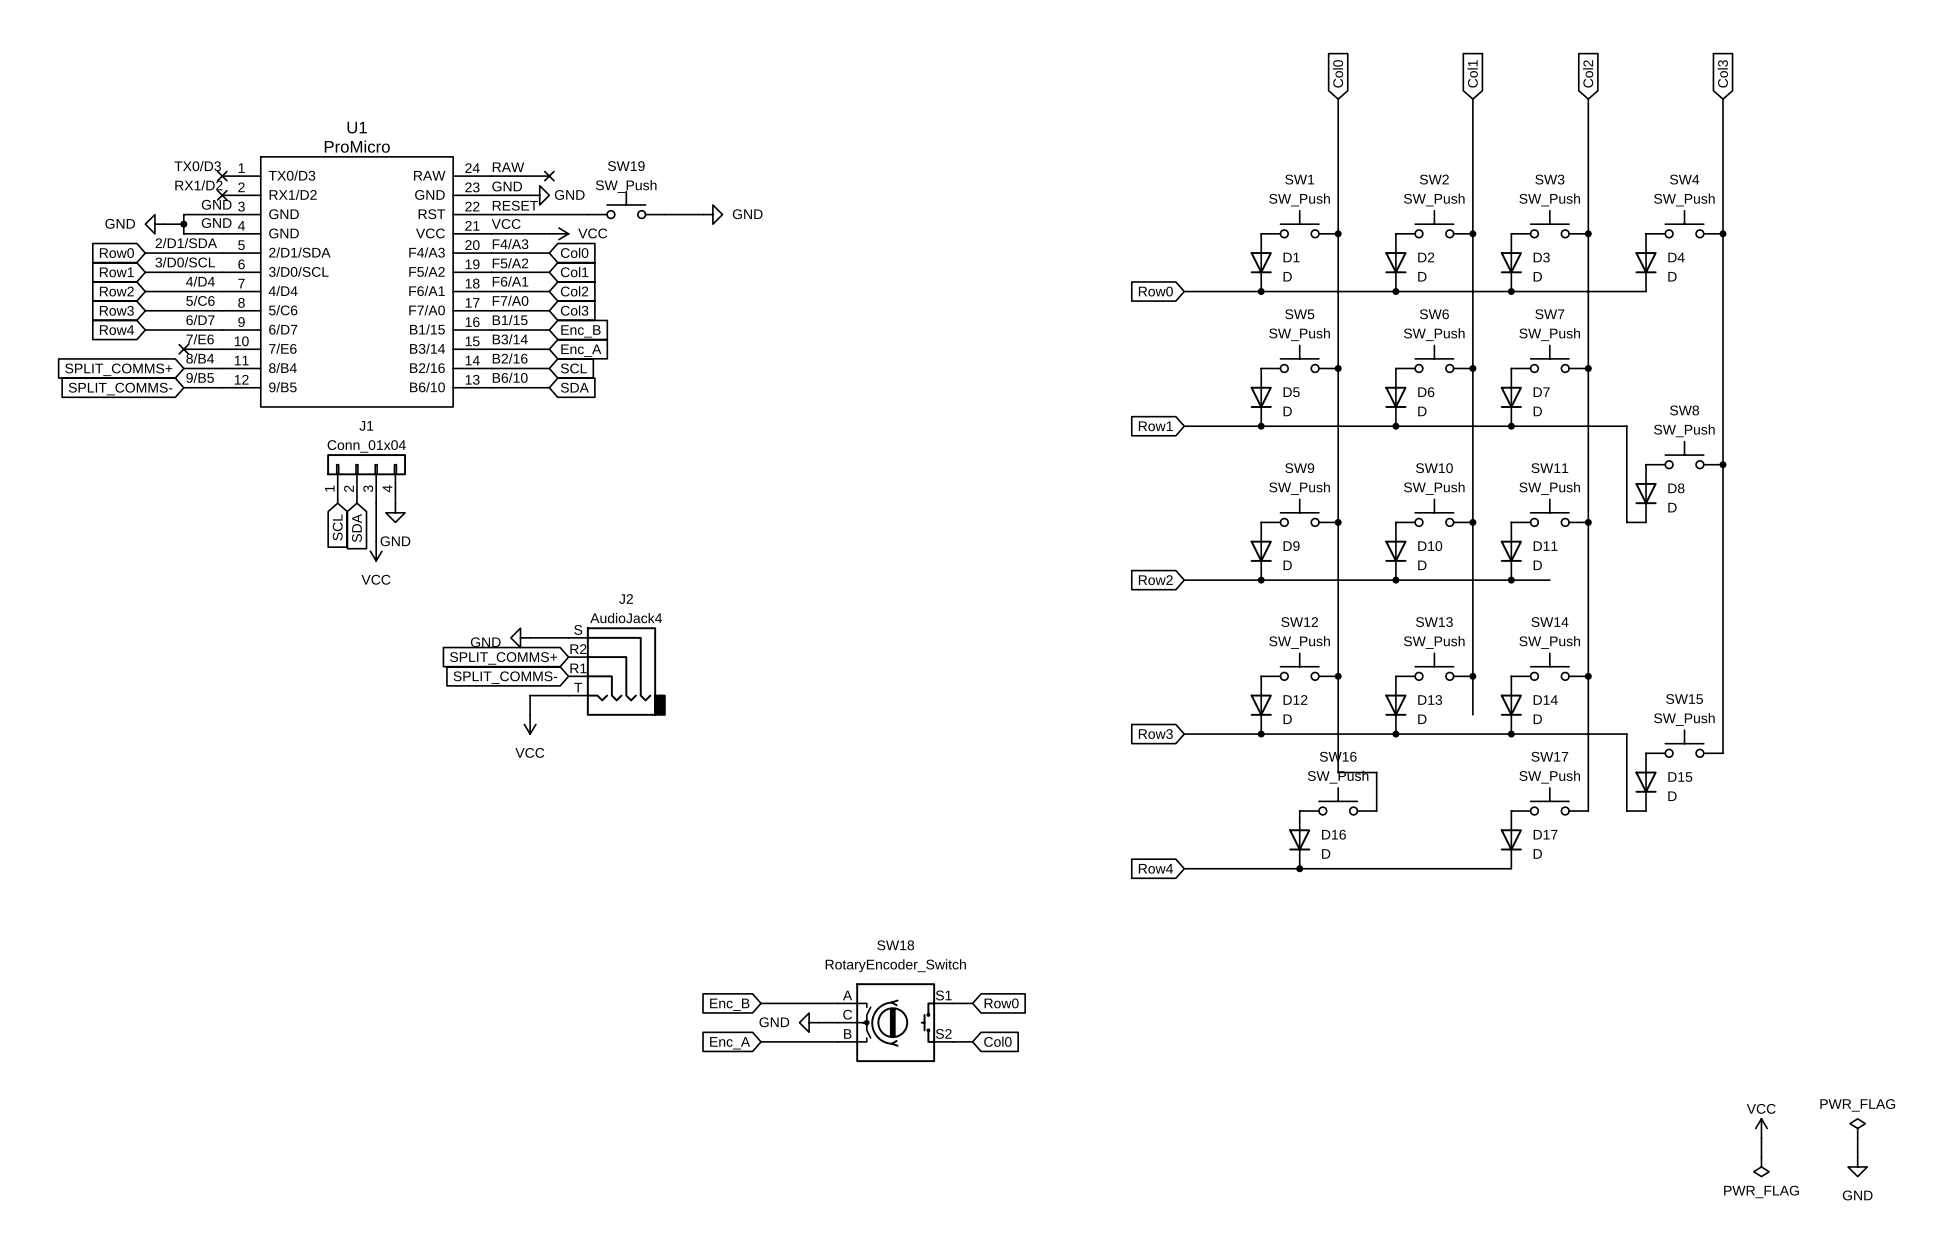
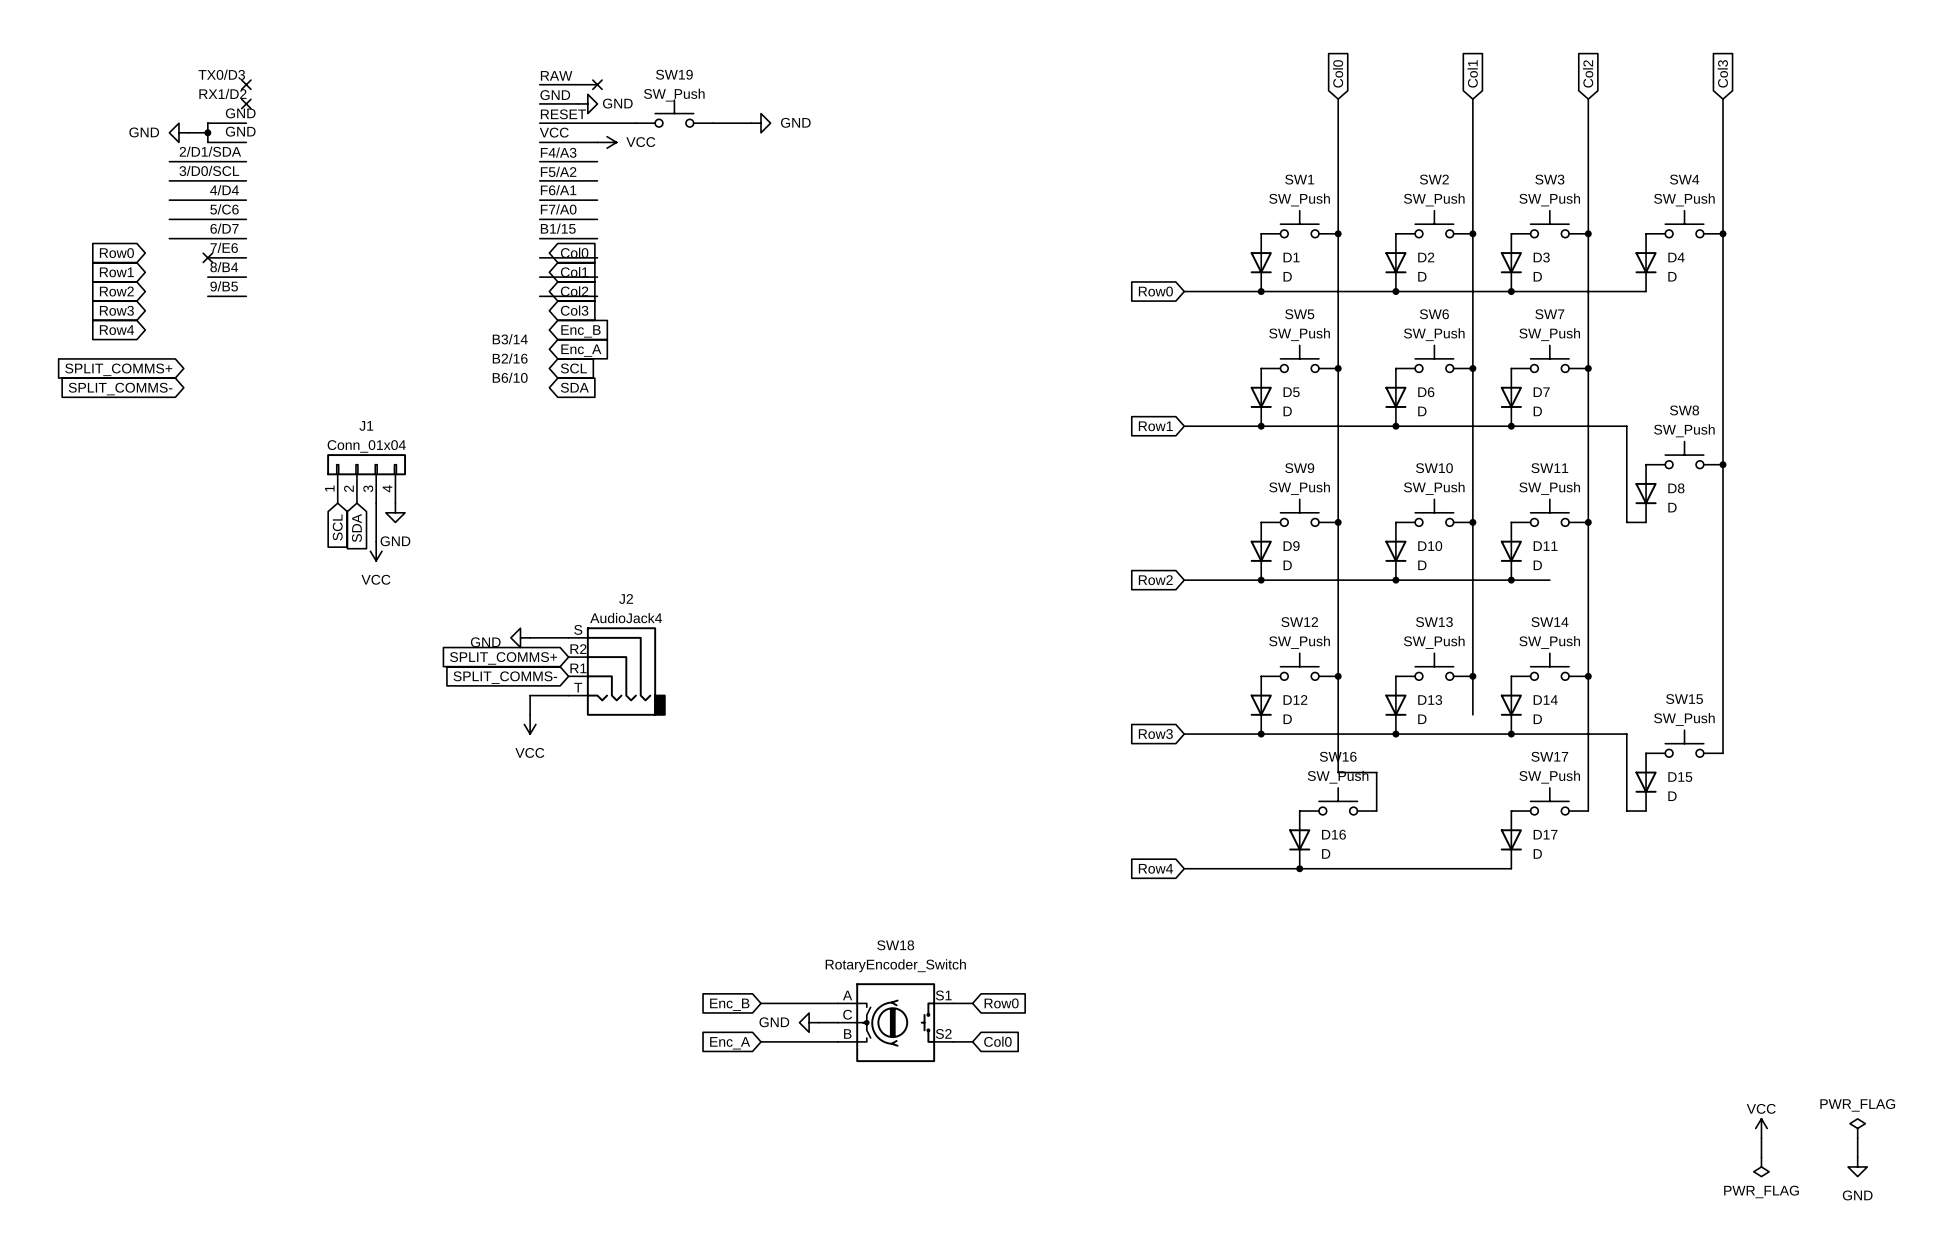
no-connect mark: none -> (246, 84)
no-connect mark: none -> (597, 84)
no-connect mark: none -> (246, 103)
power symbol: none -> GND (587, 103)
text: none -> GND (240, 113)
power symbol: none -> GND (760, 123)
text: none -> GND (240, 131)
junction: none -> (207, 132)
text position: TX0/D3 (197, 166) -> TX0/D3 (221, 74)
text position: RAW (508, 167) -> RAW (556, 75)
no-connect mark: (222, 176) -> none
wire: (491, 176) (549, 176) -> (539, 84) (597, 84)
no-connect mark: (549, 176) -> none
text position: RX1/D2 (198, 185) -> RX1/D2 (222, 93)
text position: GND (507, 186) -> GND (555, 95)
no-connect mark: (222, 195) -> none
wire: (491, 195) (530, 195) -> (539, 103) (578, 103)
power symbol: GND (539, 195) -> none
text: GND (216, 204) -> none
SW19 position: (626, 204) -> (674, 113)
text position: RESET (515, 205) -> RESET (563, 114)
wire: (222, 214) (183, 214) (183, 233) (222, 233) -> (246, 123) (207, 123) (207, 142) (246, 142)
wire: (491, 214) (587, 214) -> (539, 123) (635, 123)
wire: (664, 214) (703, 214) -> (712, 123) (751, 123)
power symbol: GND (712, 214) -> none
text: GND (216, 223) -> none
power symbol position: GND (154, 224) -> GND (178, 132)
wire: (164, 224) (183, 224) -> (188, 132) (207, 132)
junction: (183, 224) -> none
text position: VCC (506, 224) -> VCC (554, 132)
wire: (491, 233) (549, 233) -> (539, 142) (597, 142)
power symbol position: VCC (558, 233) -> VCC (607, 142)
text position: 2/D1/SDA (186, 243) -> 2/D1/SDA (210, 151)
text position: F4/A3 (510, 244) -> F4/A3 (558, 152)
wire: (145, 253) (222, 253) -> (169, 161) (246, 161)
wire: (491, 253) (549, 253) -> (539, 161) (597, 161)
no-connect mark: none -> (207, 257)
text position: 3/D0/SCL (185, 262) -> 3/D0/SCL (209, 170)
text position: F5/A2 (510, 263) -> F5/A2 (558, 171)
wire: (145, 272) (222, 272) -> (169, 180) (246, 180)
wire: (491, 272) (549, 272) -> (539, 180) (597, 180)
text position: 4/D4 (200, 281) -> 4/D4 (224, 190)
U1: ProMicro (356, 281) -> none
text position: F6/A1 (510, 281) -> F6/A1 (558, 190)
wire: (145, 291) (222, 291) -> (169, 200) (246, 200)
wire: (491, 291) (549, 291) -> (539, 200) (597, 200)
text position: 5/C6 (200, 300) -> 5/C6 (224, 209)
text position: F7/A0 (510, 300) -> F7/A0 (558, 209)
wire: (145, 310) (222, 310) -> (169, 219) (246, 219)
wire: (491, 310) (549, 310) -> (539, 219) (597, 219)
text position: 6/D7 (200, 320) -> 6/D7 (224, 228)
text position: B1/15 (510, 320) -> B1/15 (558, 228)
wire: (145, 330) (222, 330) -> (169, 238) (246, 238)
wire: (491, 330) (549, 330) -> (539, 238) (597, 238)
text position: 7/E6 (200, 339) -> 7/E6 (224, 247)
wire: (183, 349) (222, 349) -> (207, 257) (246, 257)
no-connect mark: (183, 349) -> none
wire: (491, 349) (549, 349) -> (539, 257) (597, 257)
text position: 8/B4 (200, 358) -> 8/B4 (224, 267)
wire: (183, 368) (222, 368) -> (207, 277) (246, 277)
wire: (491, 368) (549, 368) -> (539, 277) (597, 277)
text position: 9/B5 (200, 377) -> 9/B5 (224, 286)
wire: (183, 387) (222, 387) -> (207, 296) (246, 296)
wire: (491, 387) (549, 387) -> (539, 296) (597, 296)

